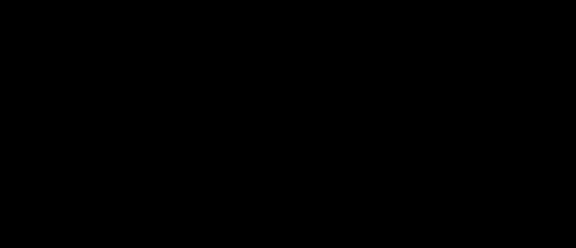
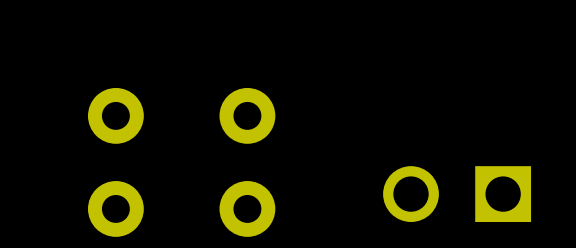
part: none -> (115, 162)
part: none -> (247, 162)
part: none -> (457, 194)

